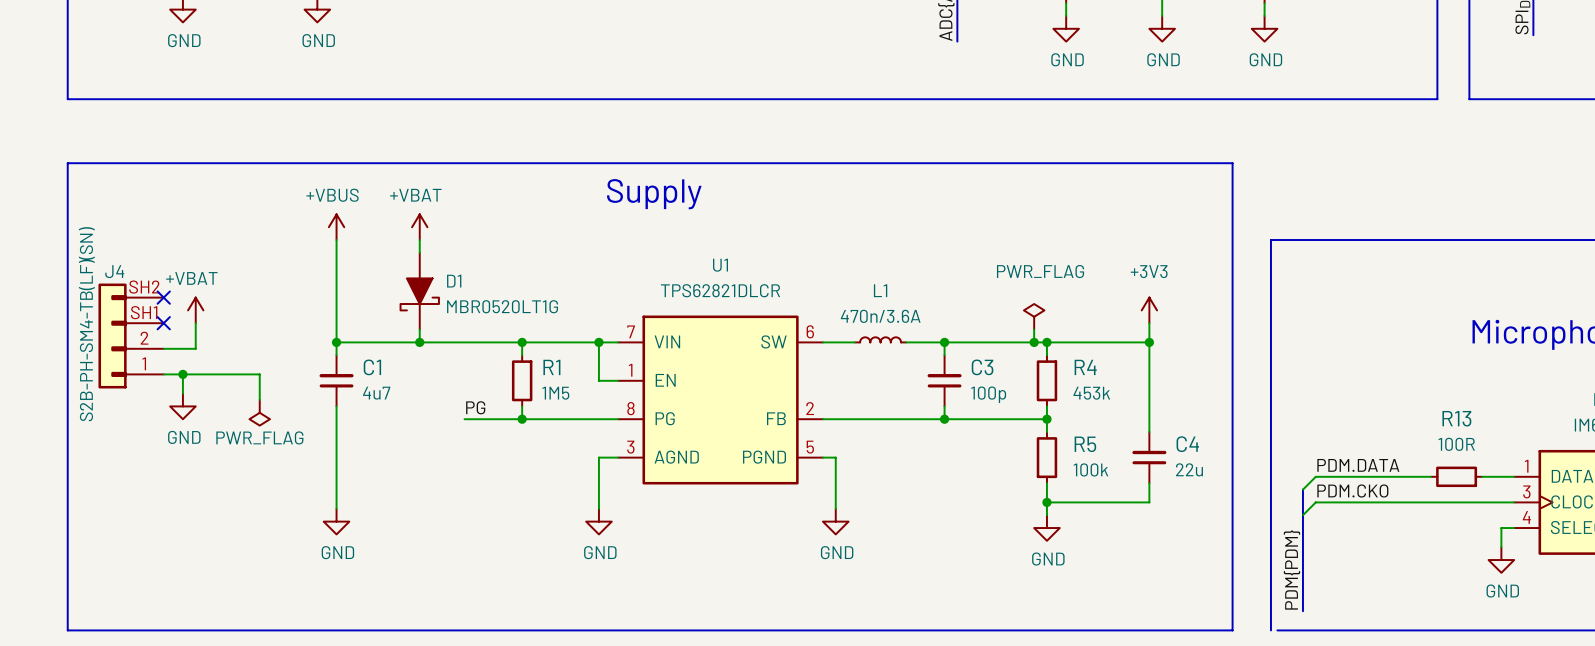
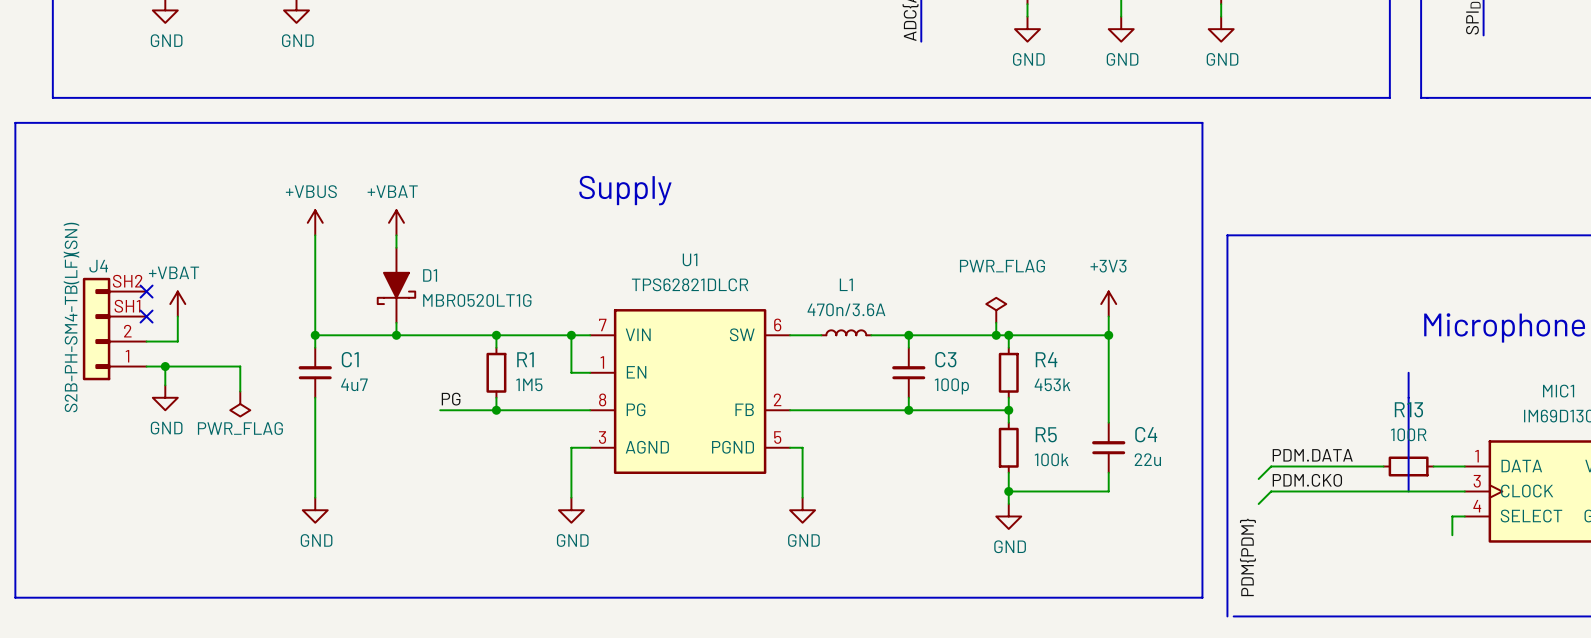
line: (67, 163) (1232, 163) (1232, 630) (67, 630) (67, 163) -> (15, 122) (15, 597) (1202, 597) (1202, 122) (15, 122)
bus: (1302, 489) (1302, 611) -> (1408, 372) (1408, 491)
power symbol: GND (1501, 560) -> none

